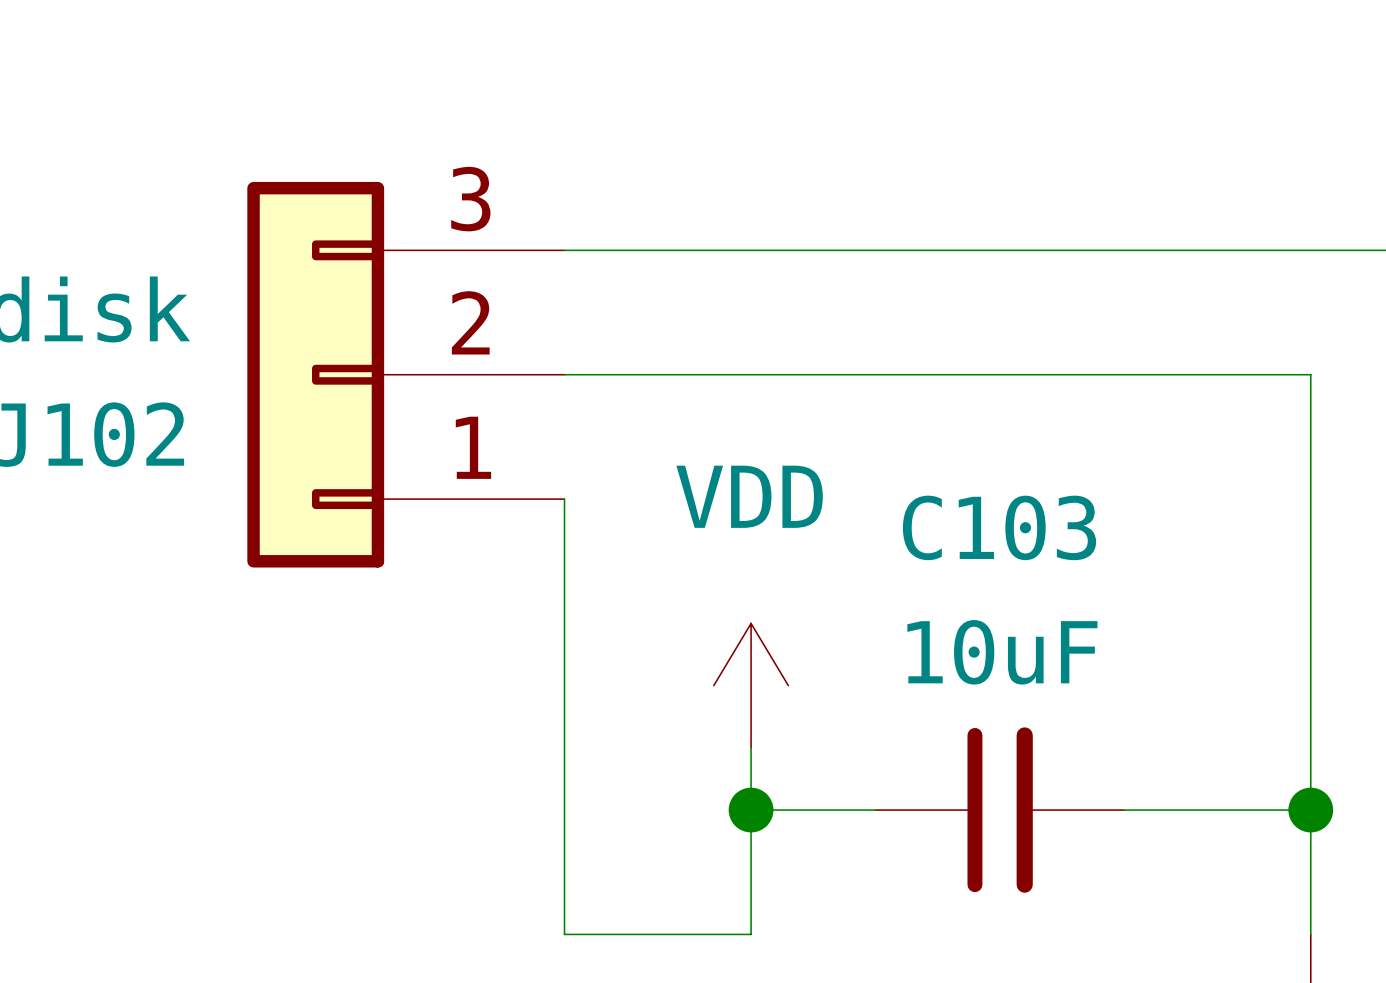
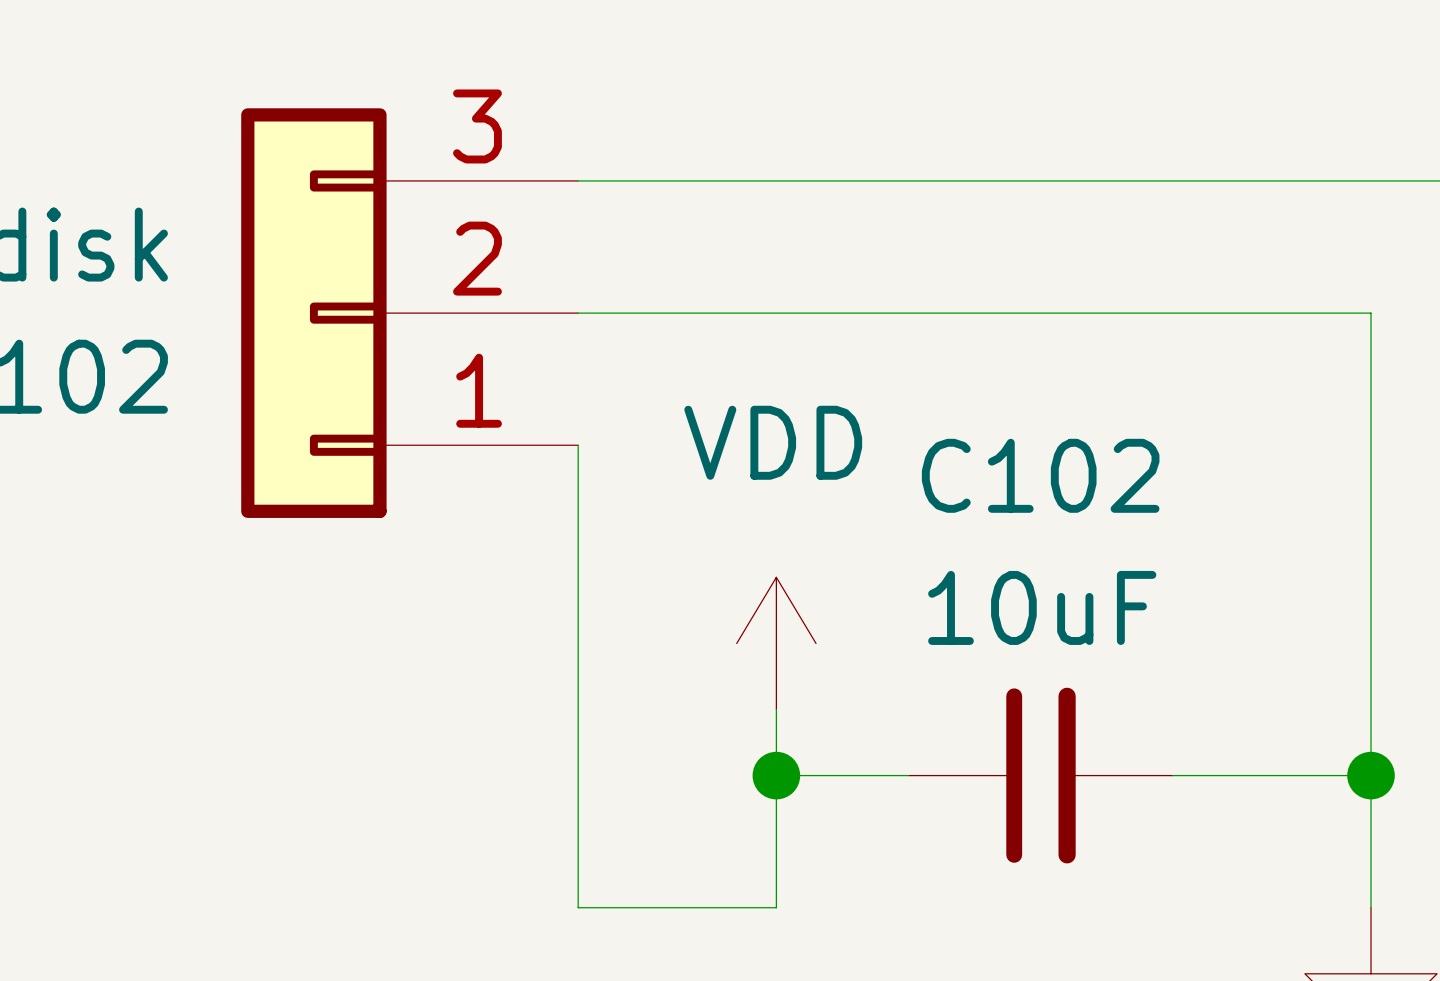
C103 name: C103 (999, 527) -> C102 (1040, 475)

